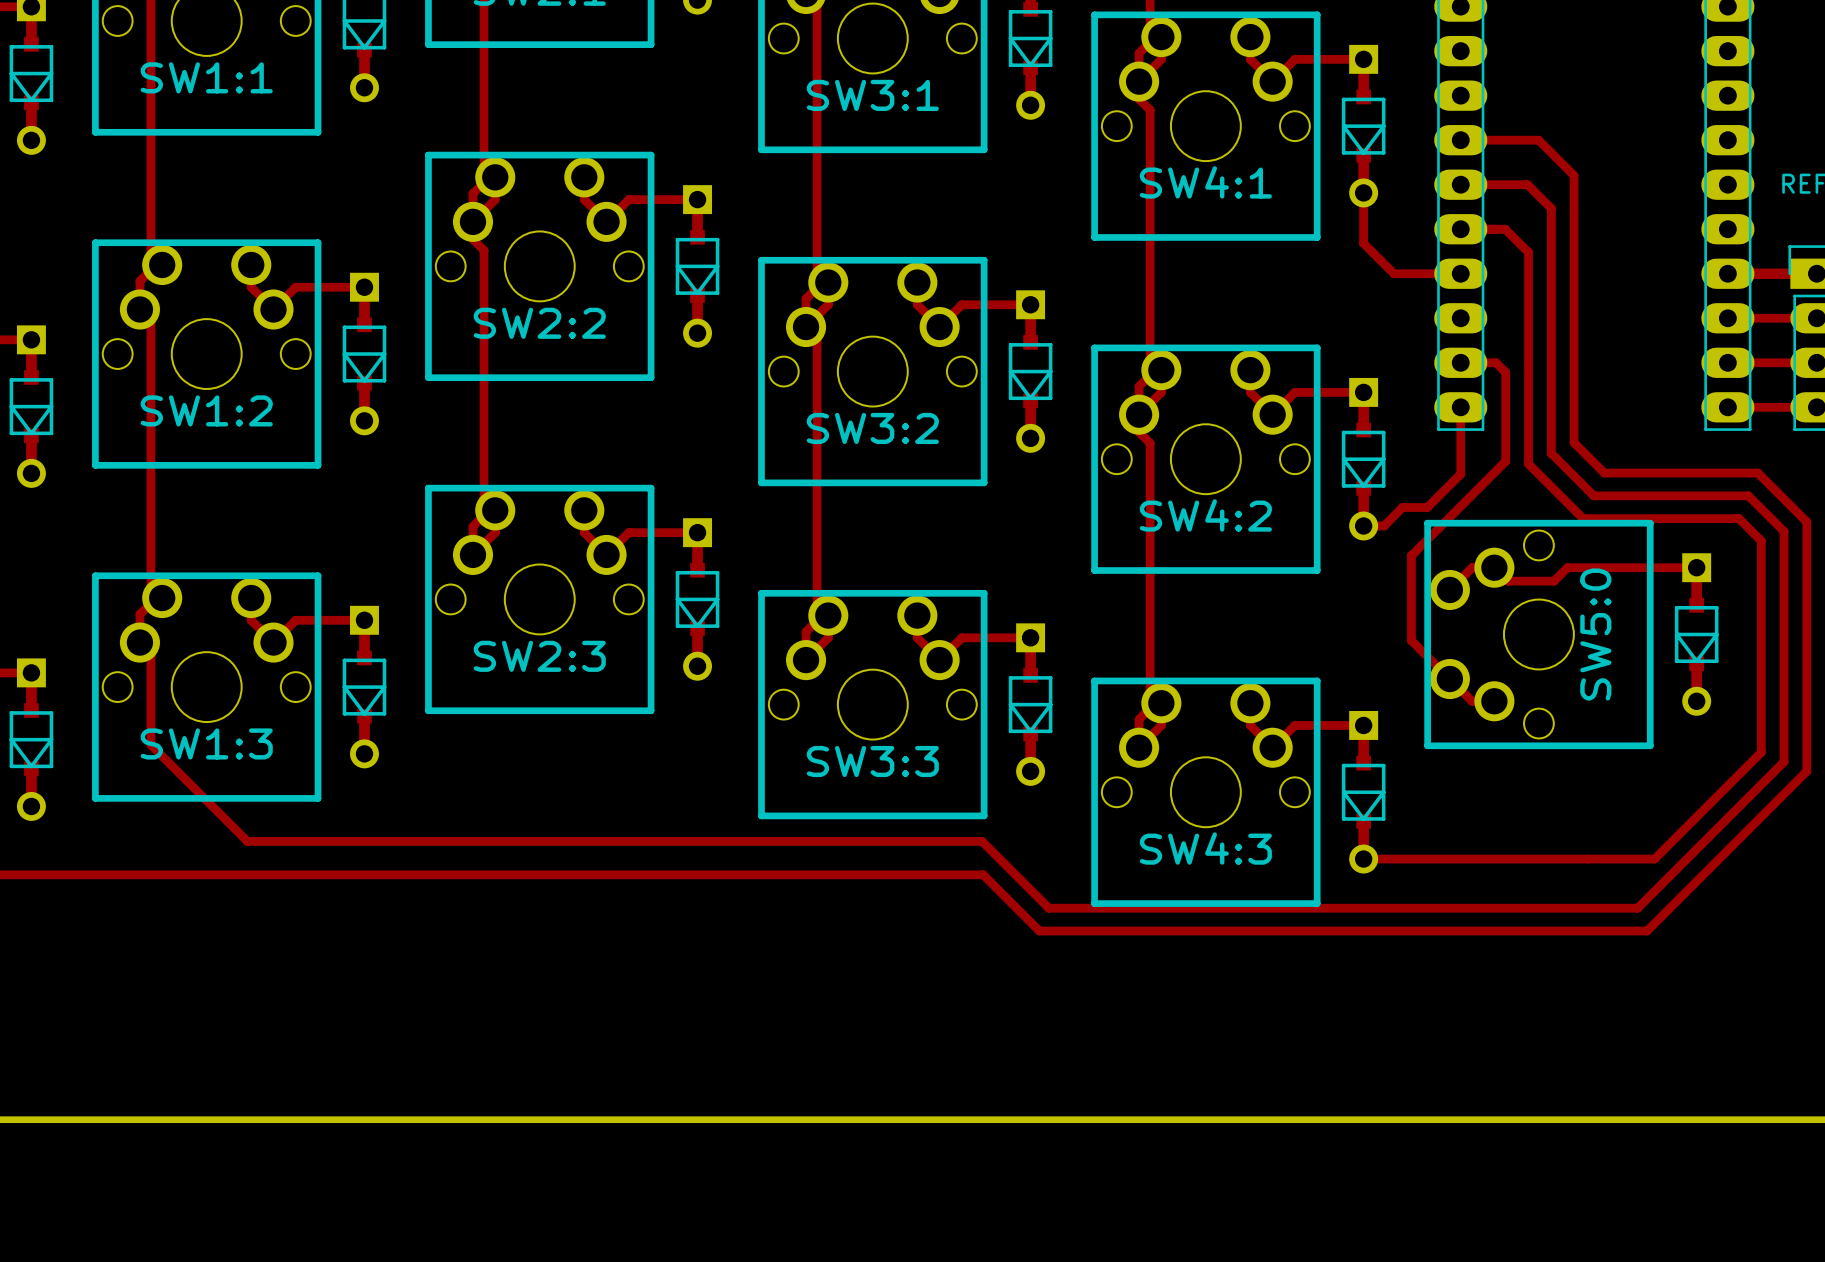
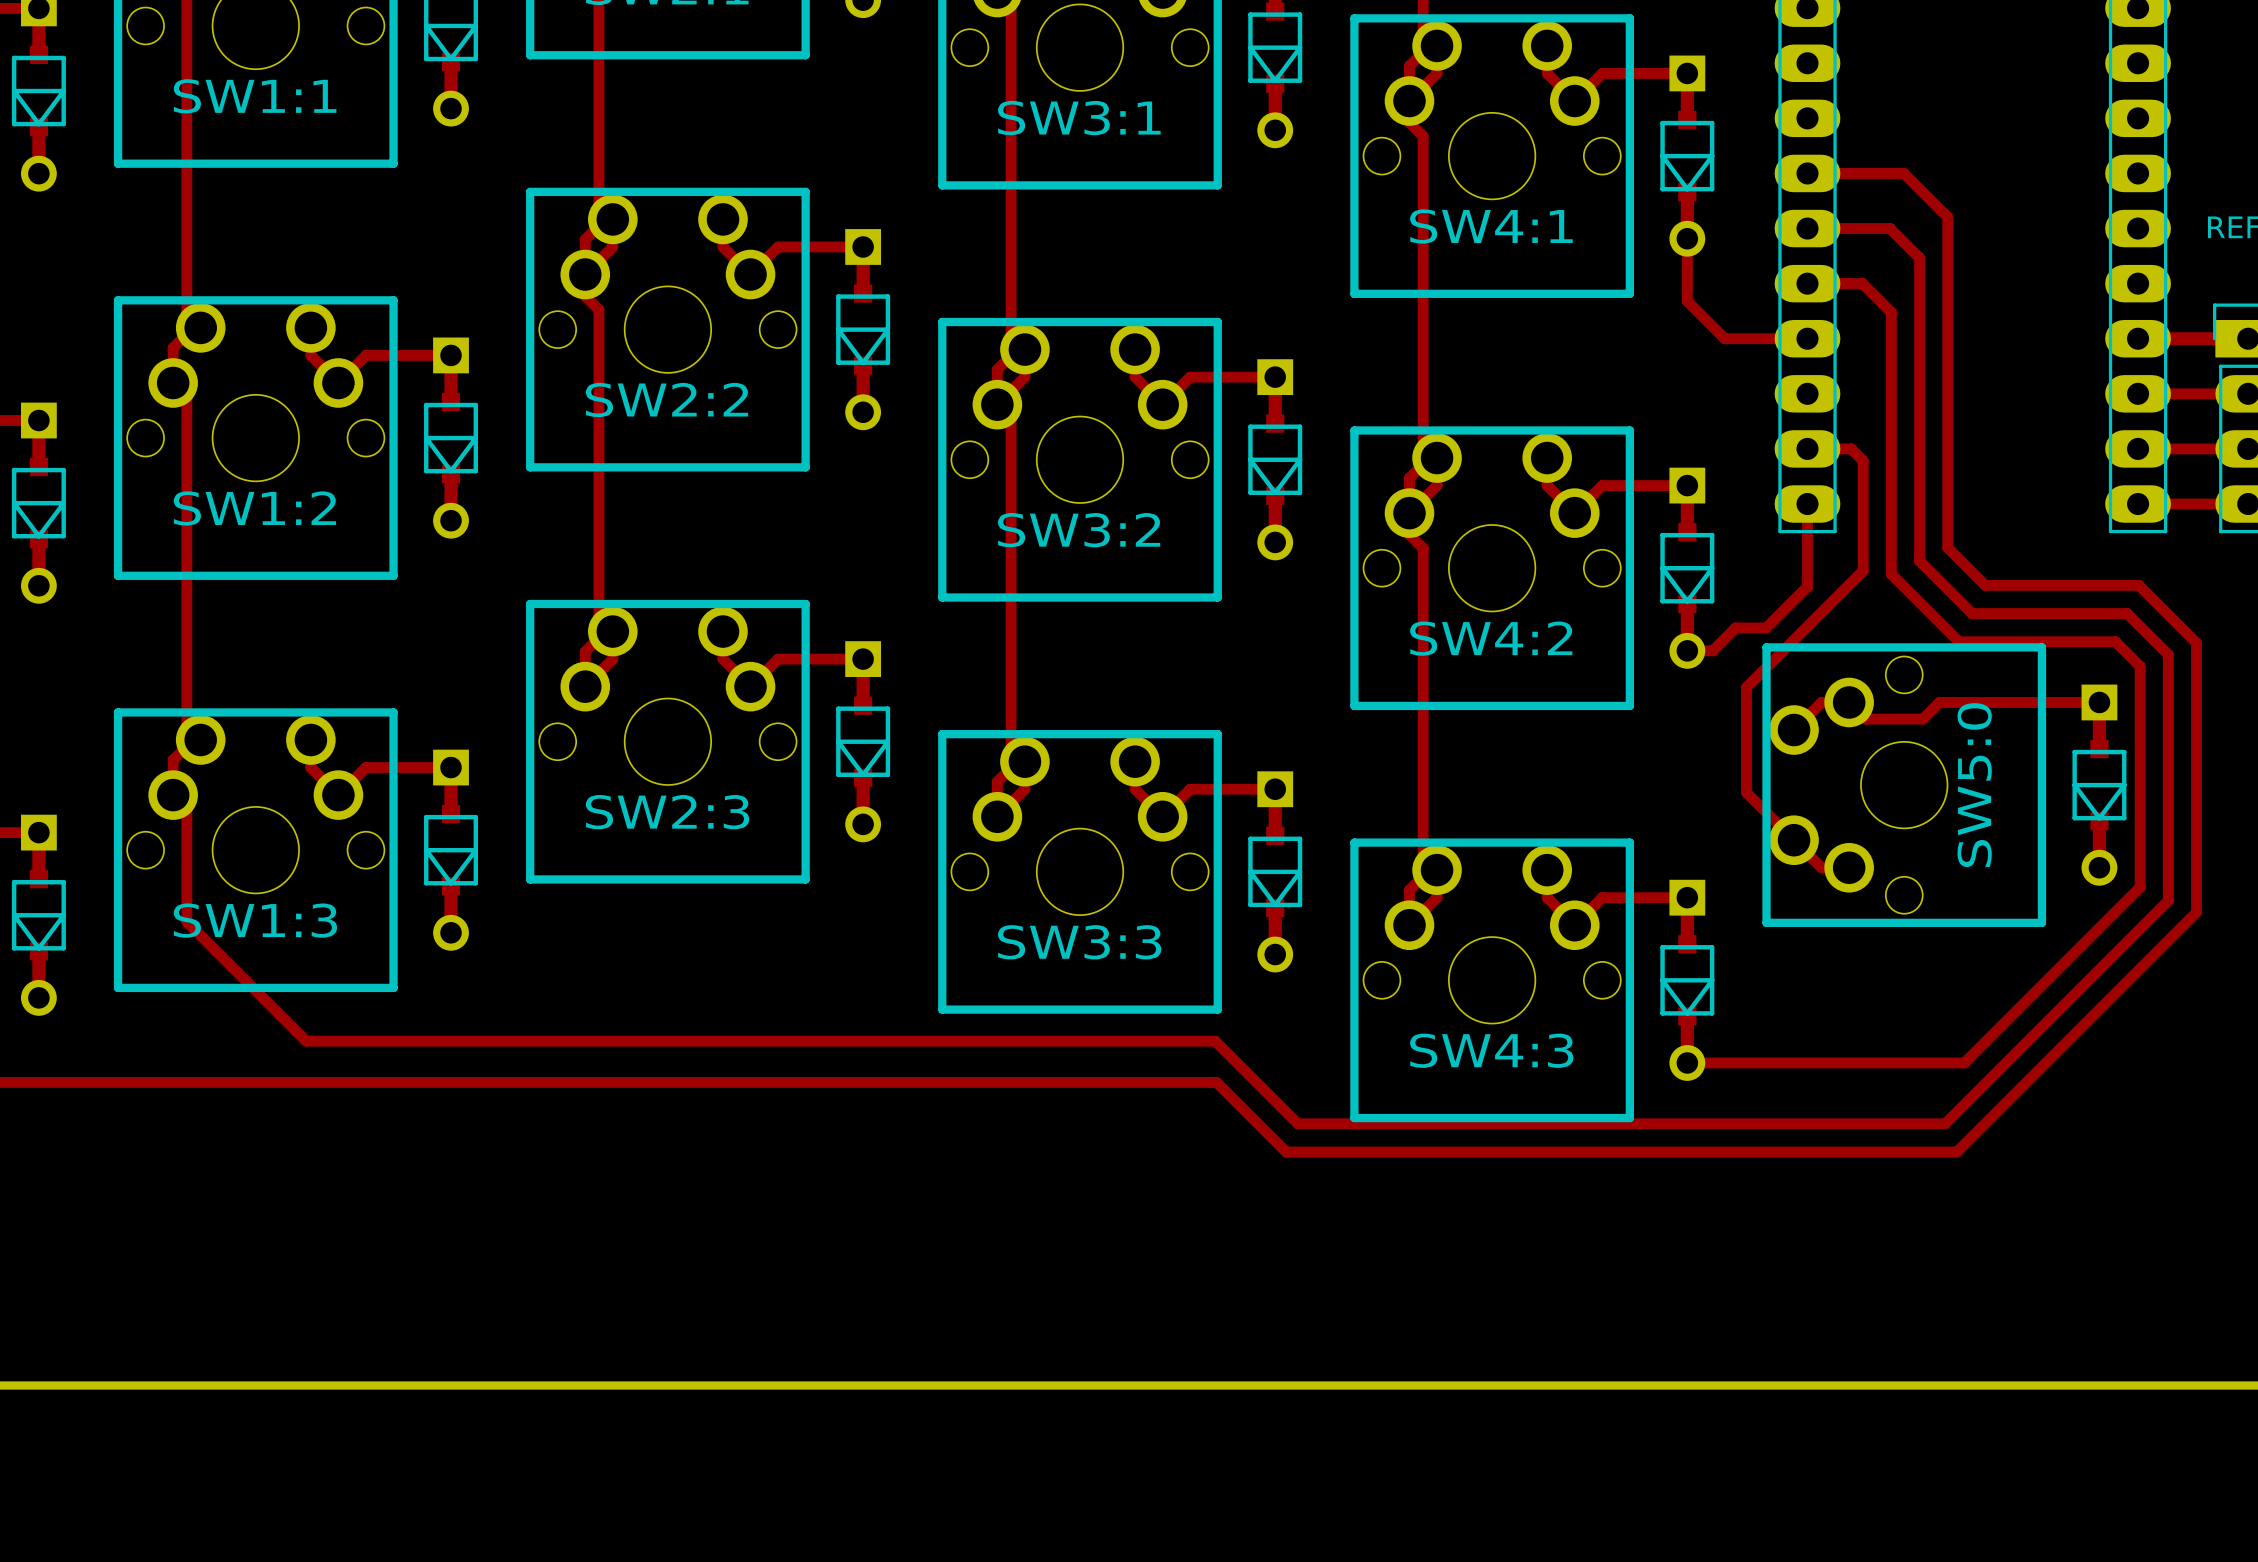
track: (1728, 473) (1757, 473) (1806, 522) (1806, 771) (1647, 931) (1581, 931) -> (2138, 585) (2196, 642) (2196, 912) (1956, 1152)
track: (1719, 495) (1748, 495) (1784, 531) (1784, 761) (1637, 908) (1572, 908) -> (2127, 613) (2168, 654) (2168, 900) (1945, 1123)
track: (1709, 518) (1739, 518) (1761, 540) (1761, 752) (1654, 859) (1587, 859) -> (2115, 641) (2140, 666) (2140, 887) (1964, 1062)

